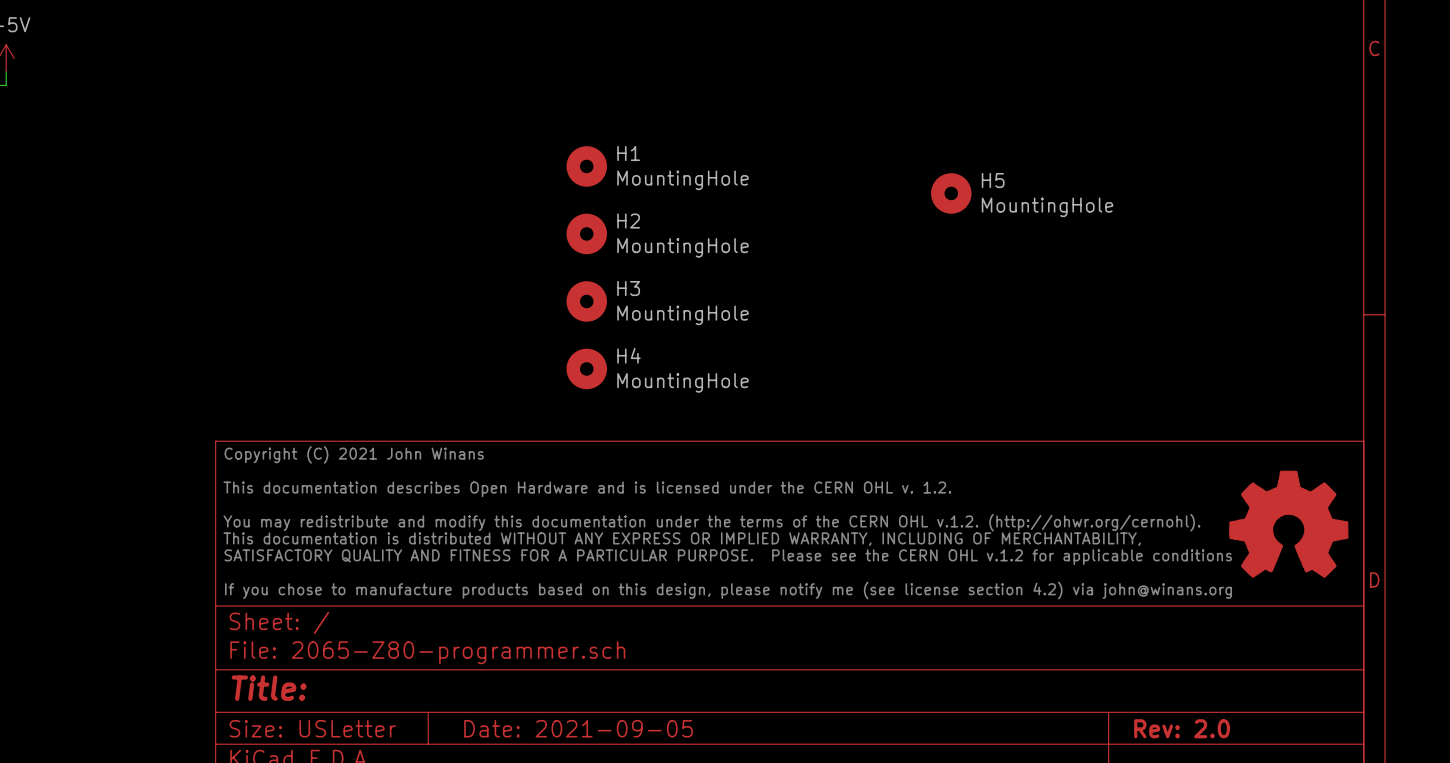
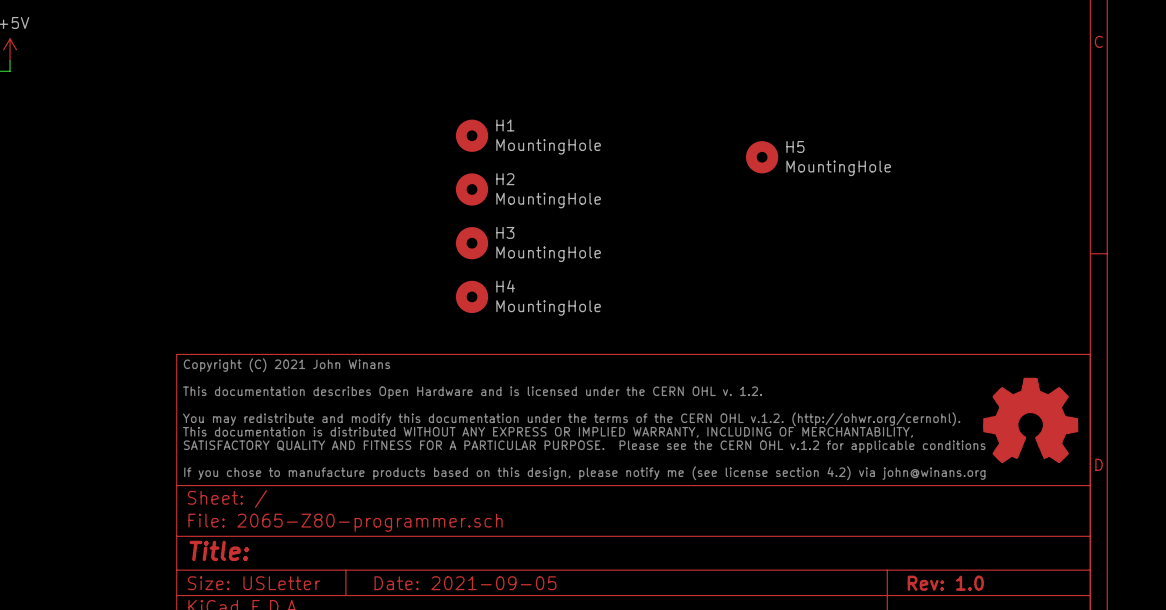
title block: Rev: 2.0 (1182, 728) -> Rev: 1.0 (945, 583)

